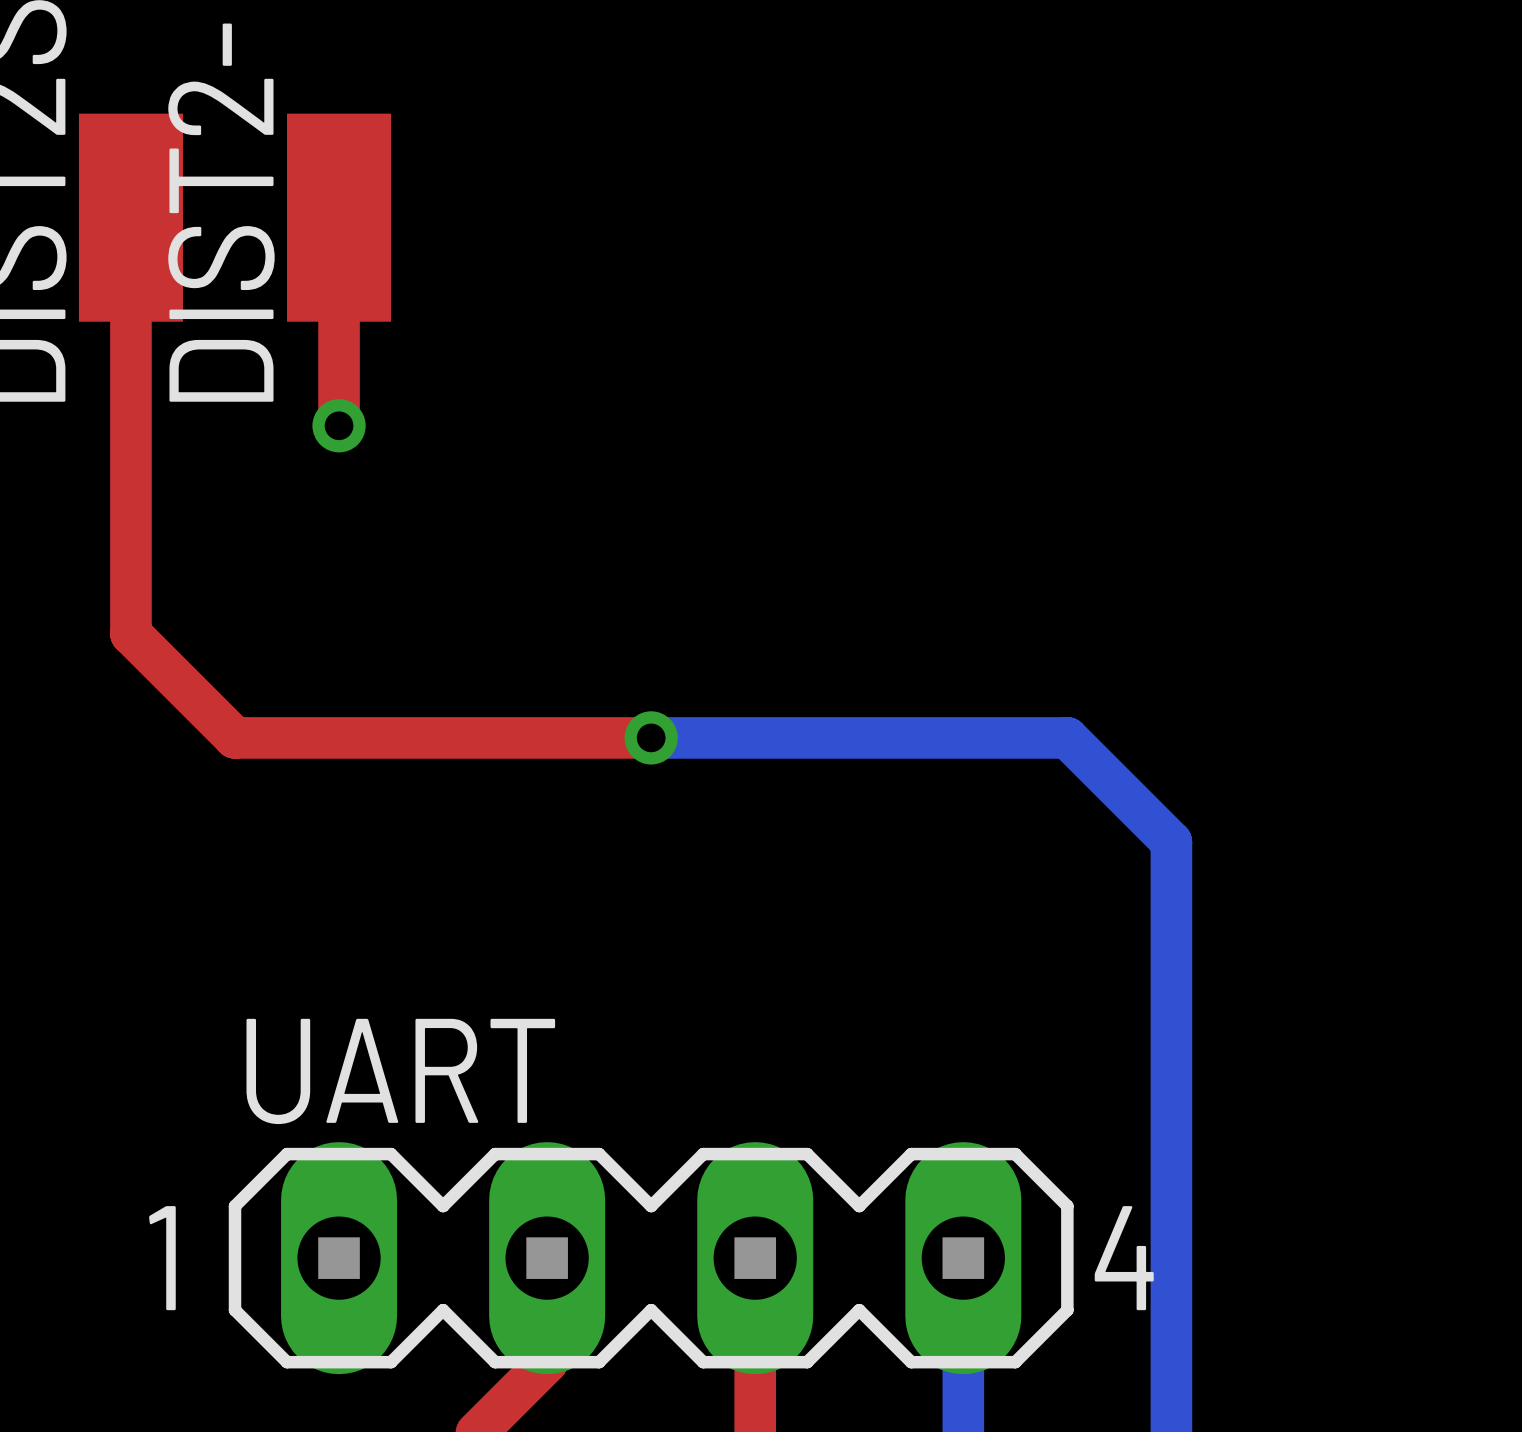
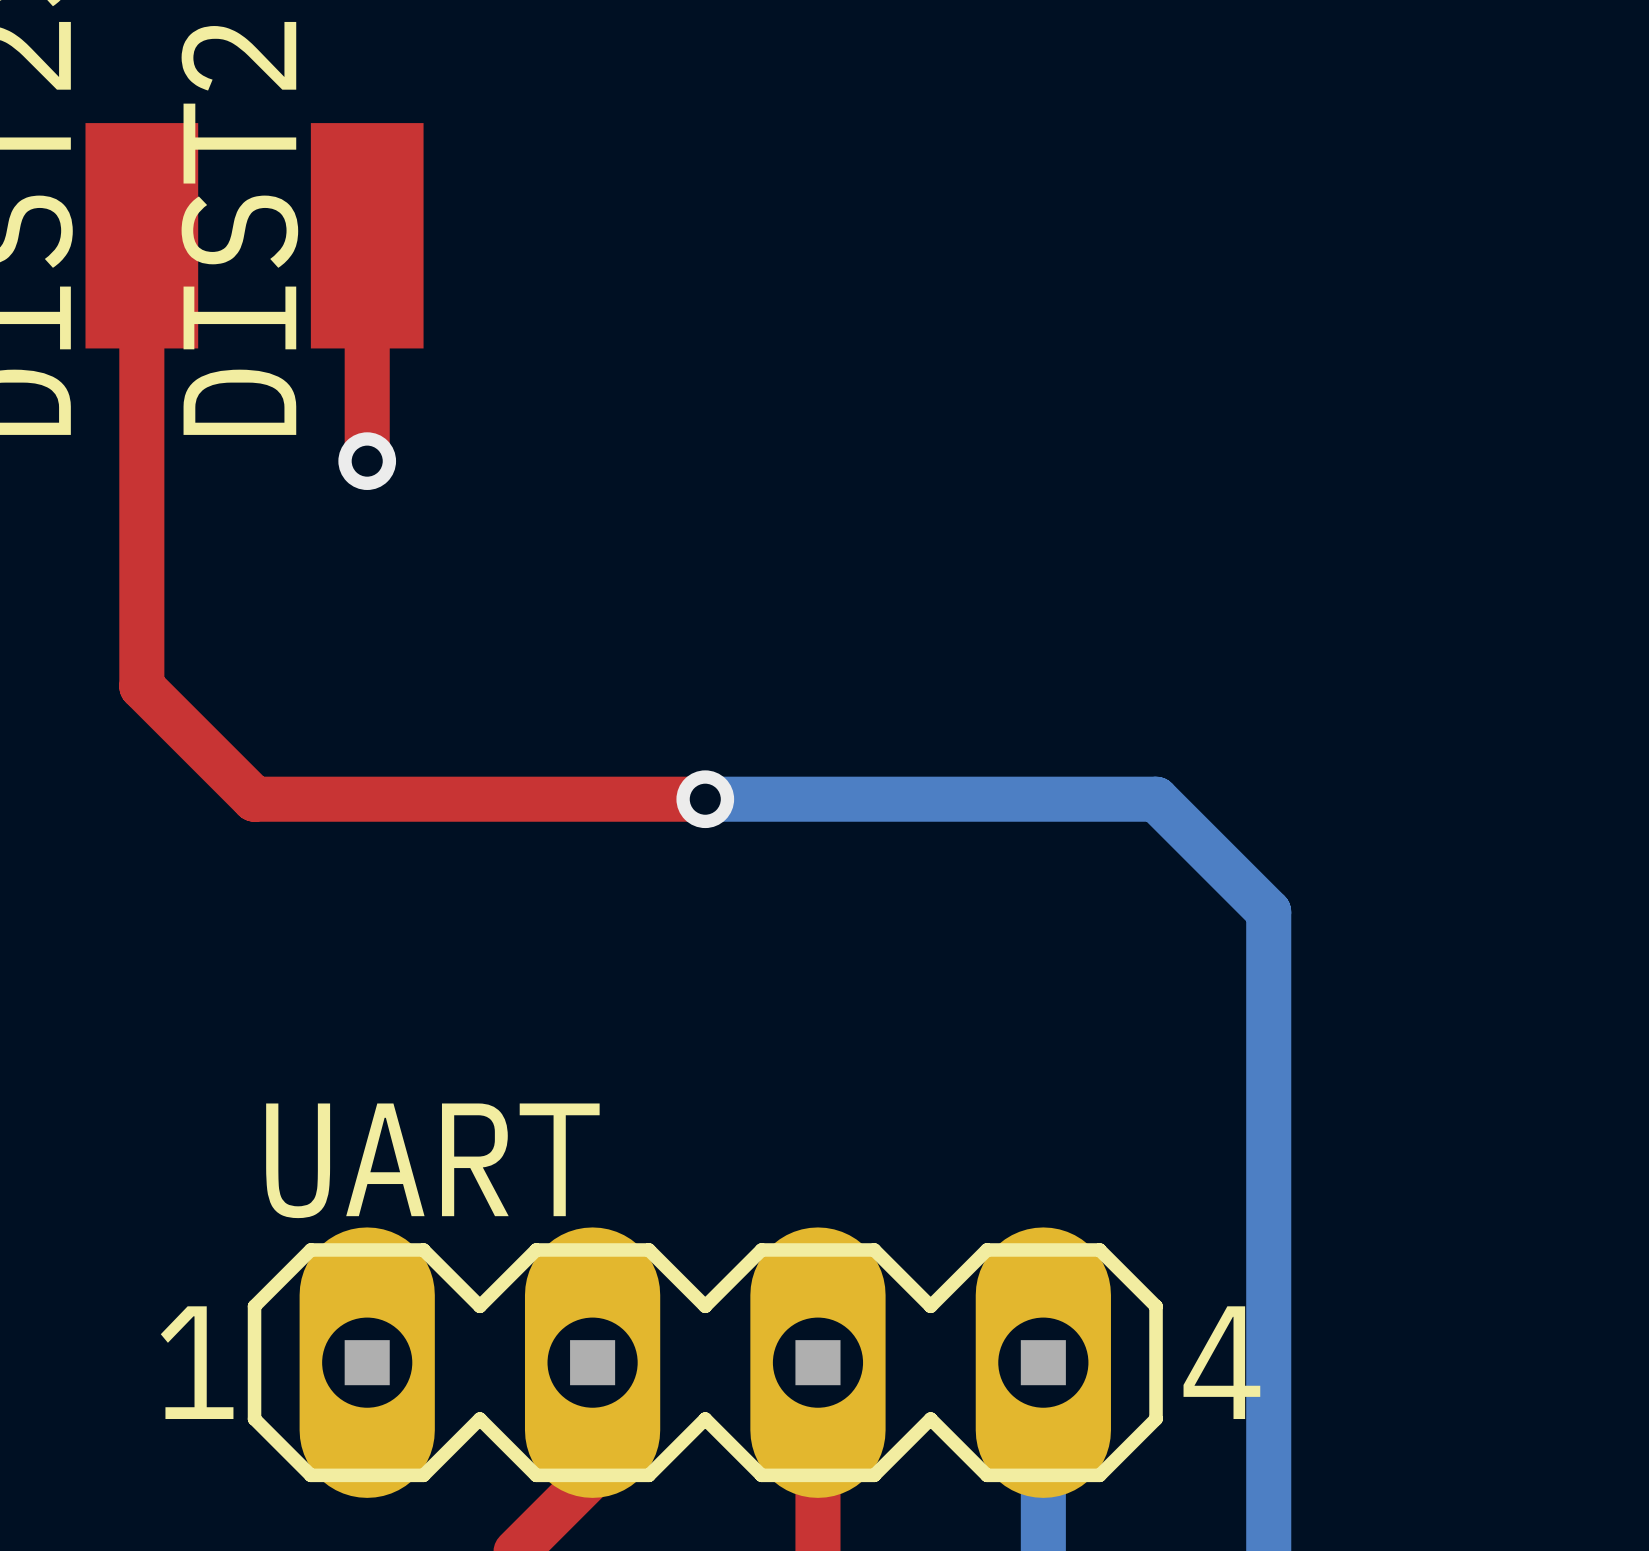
UART footprint: [228, 1142, 1074, 1375] -> [247, 1227, 1163, 1498]

